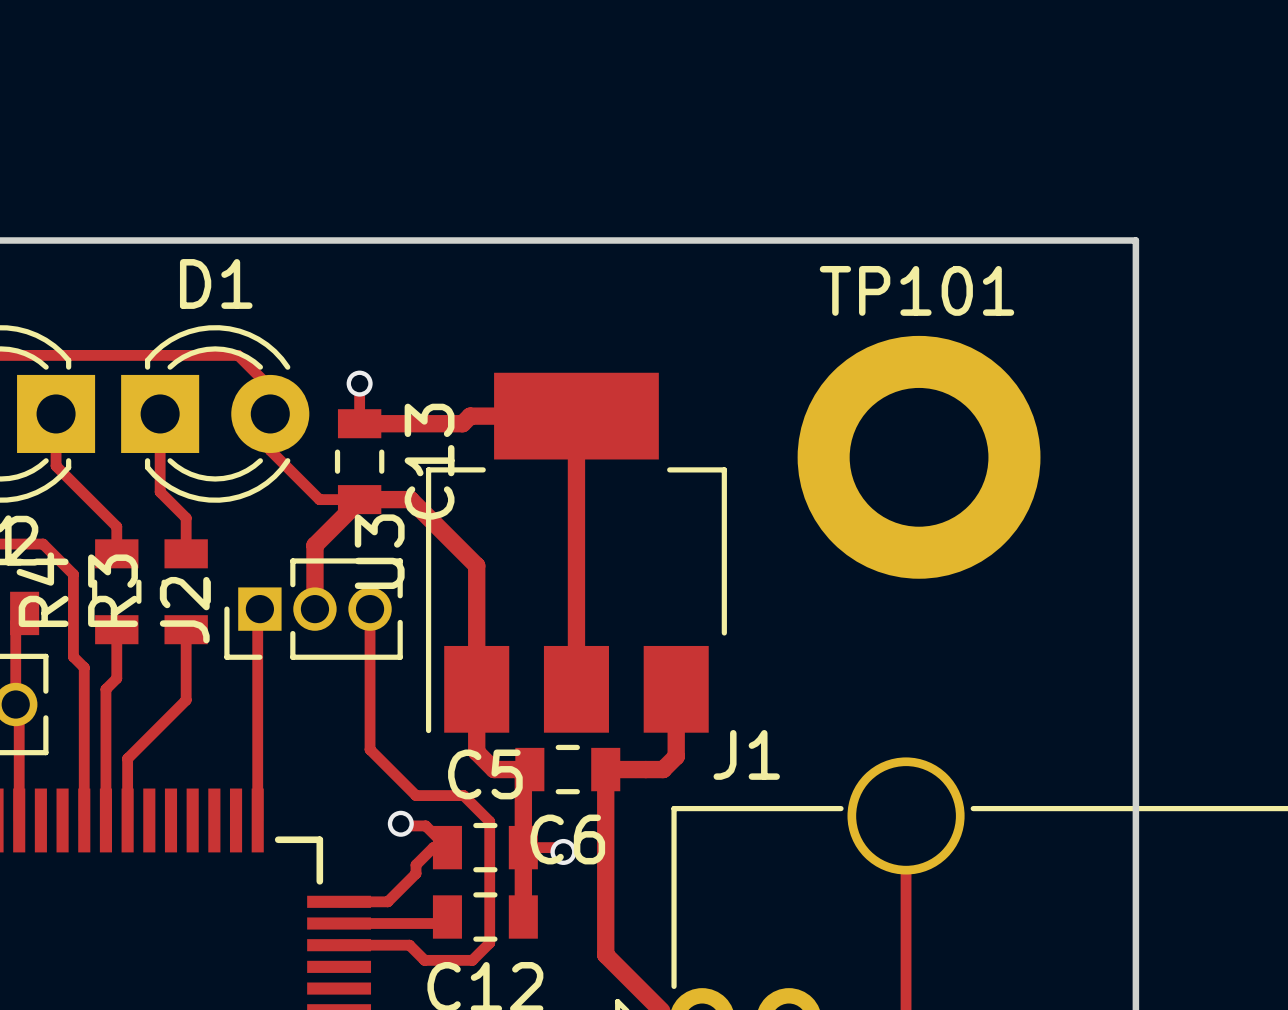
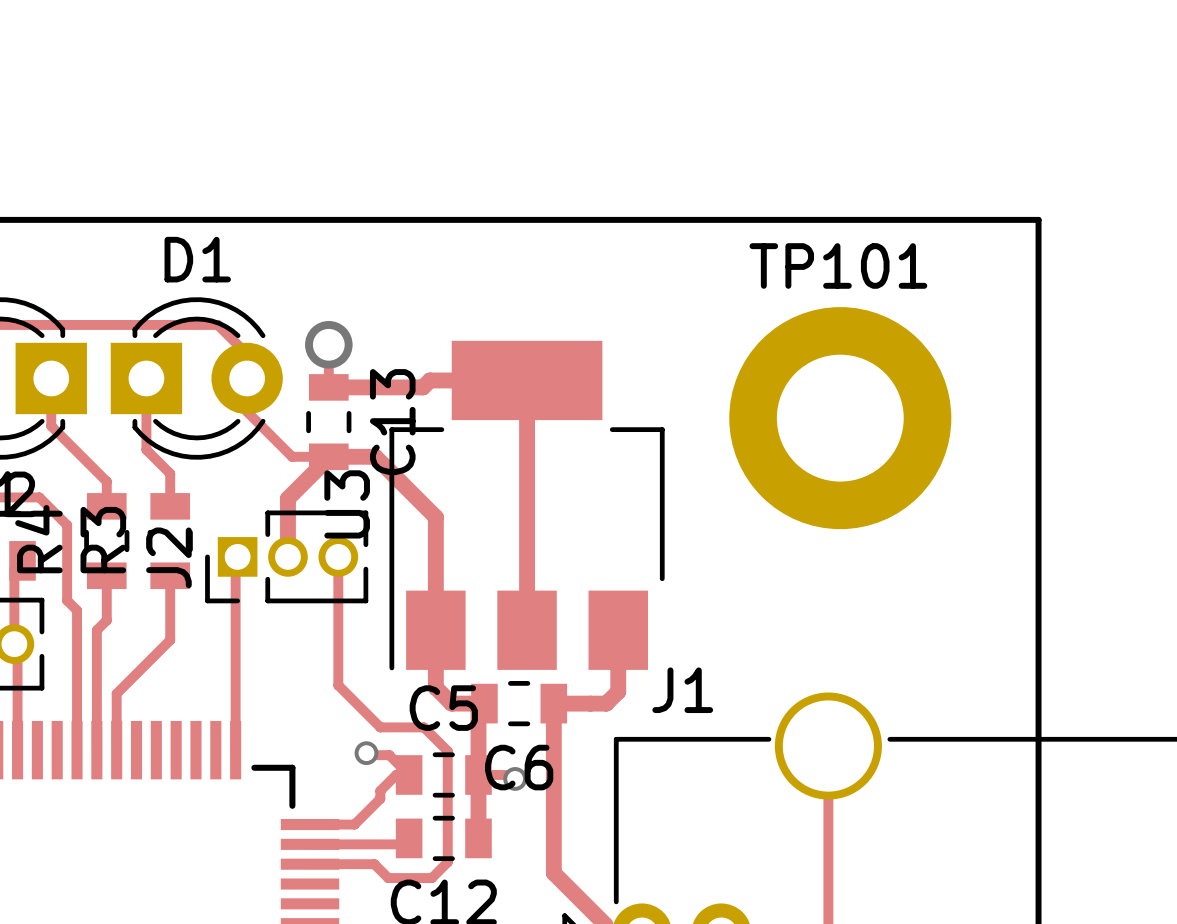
via size: [346, 370, 373, 397] -> [305, 320, 353, 369]

